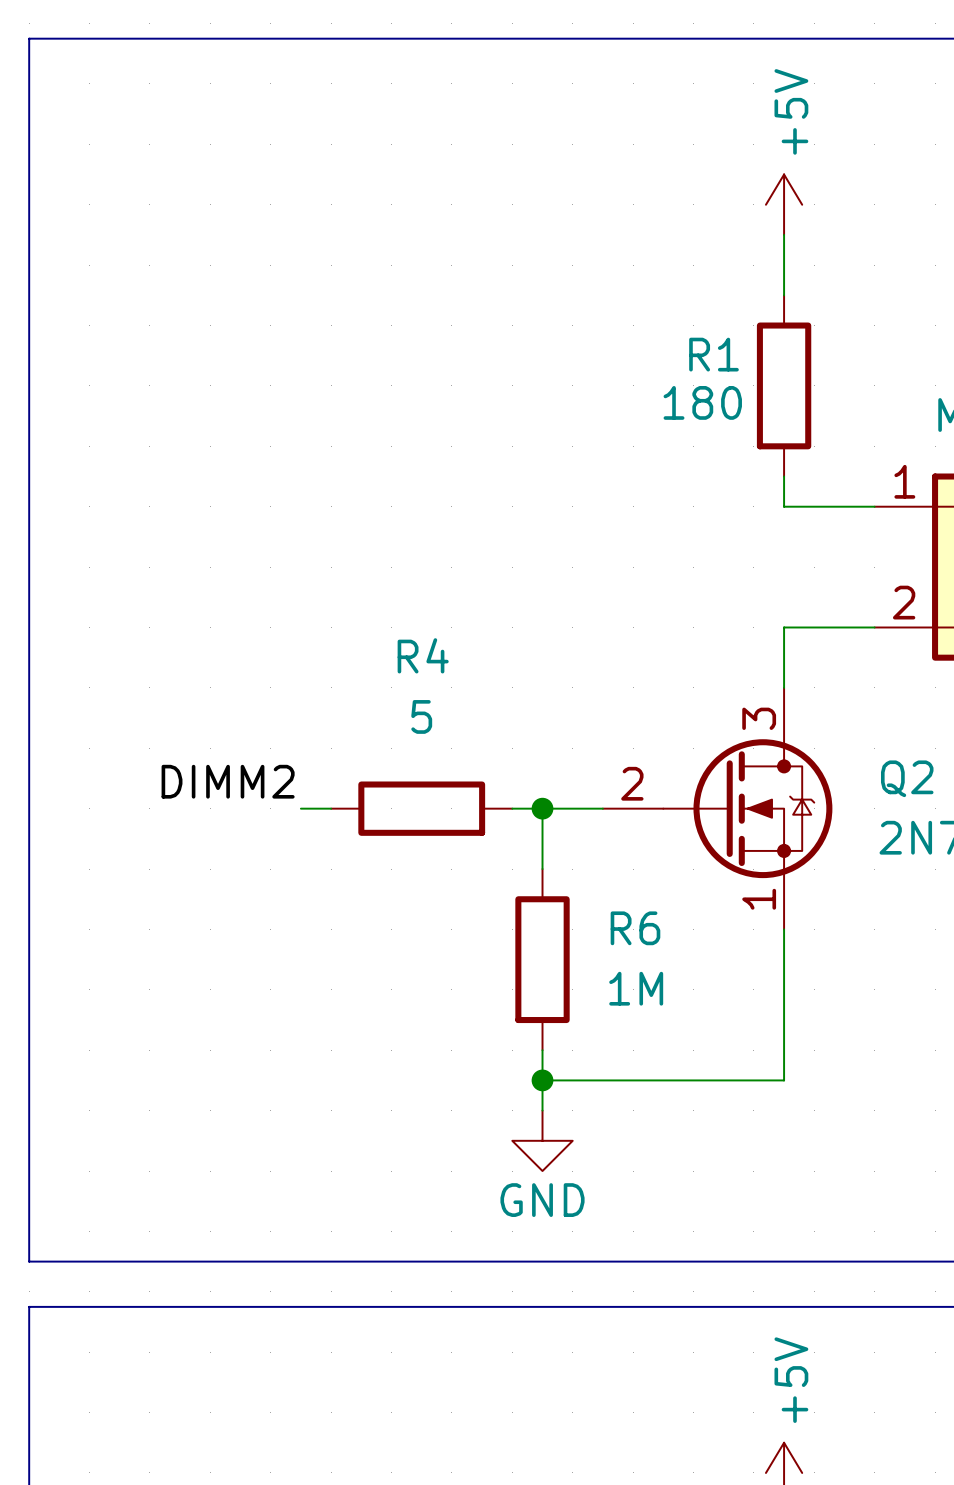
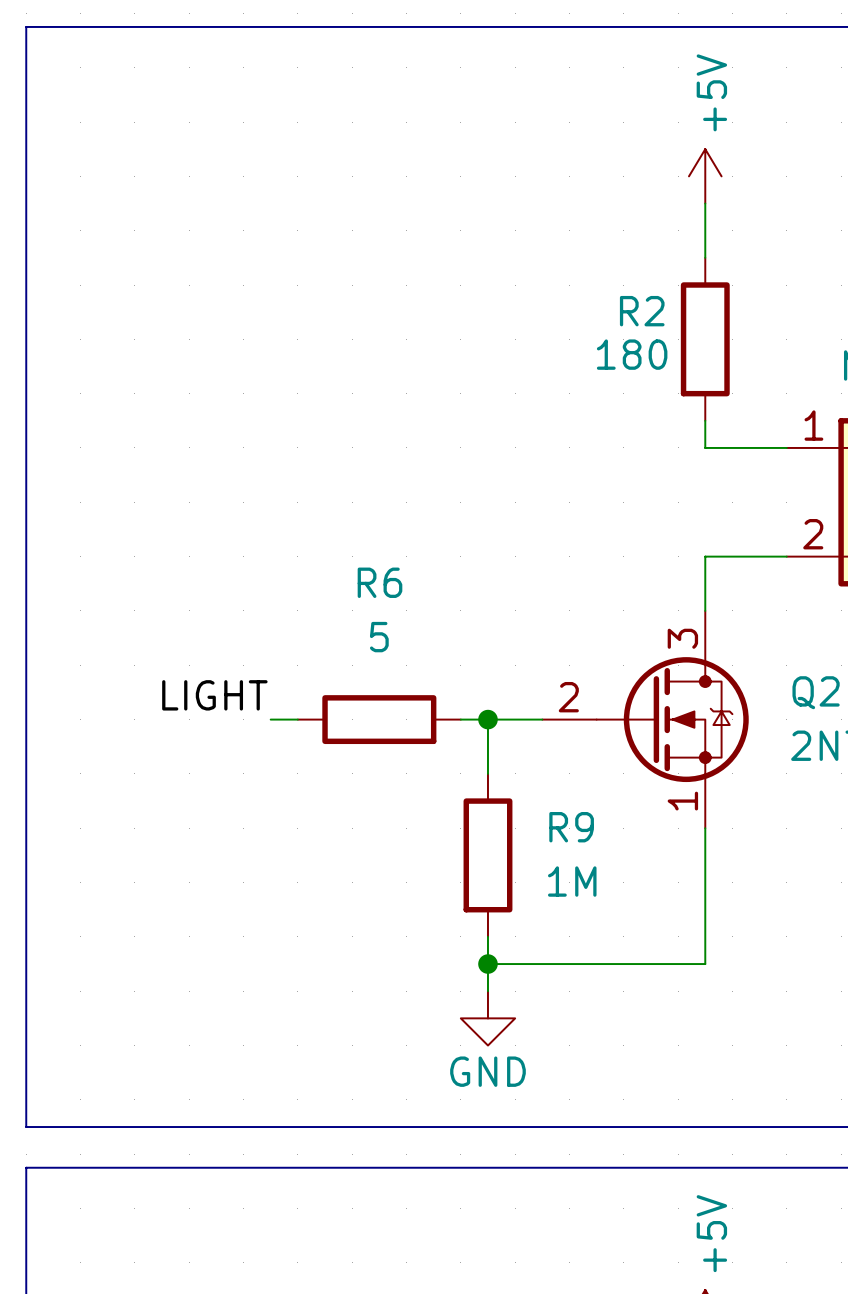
R1 name: R1 (713, 354) -> R2 (642, 311)
R4 name: R4 (423, 655) -> R6 (379, 582)
label: DIMM2 (228, 781) -> LIGHT (214, 695)
R6 name: R6 (635, 928) -> R9 (571, 827)

